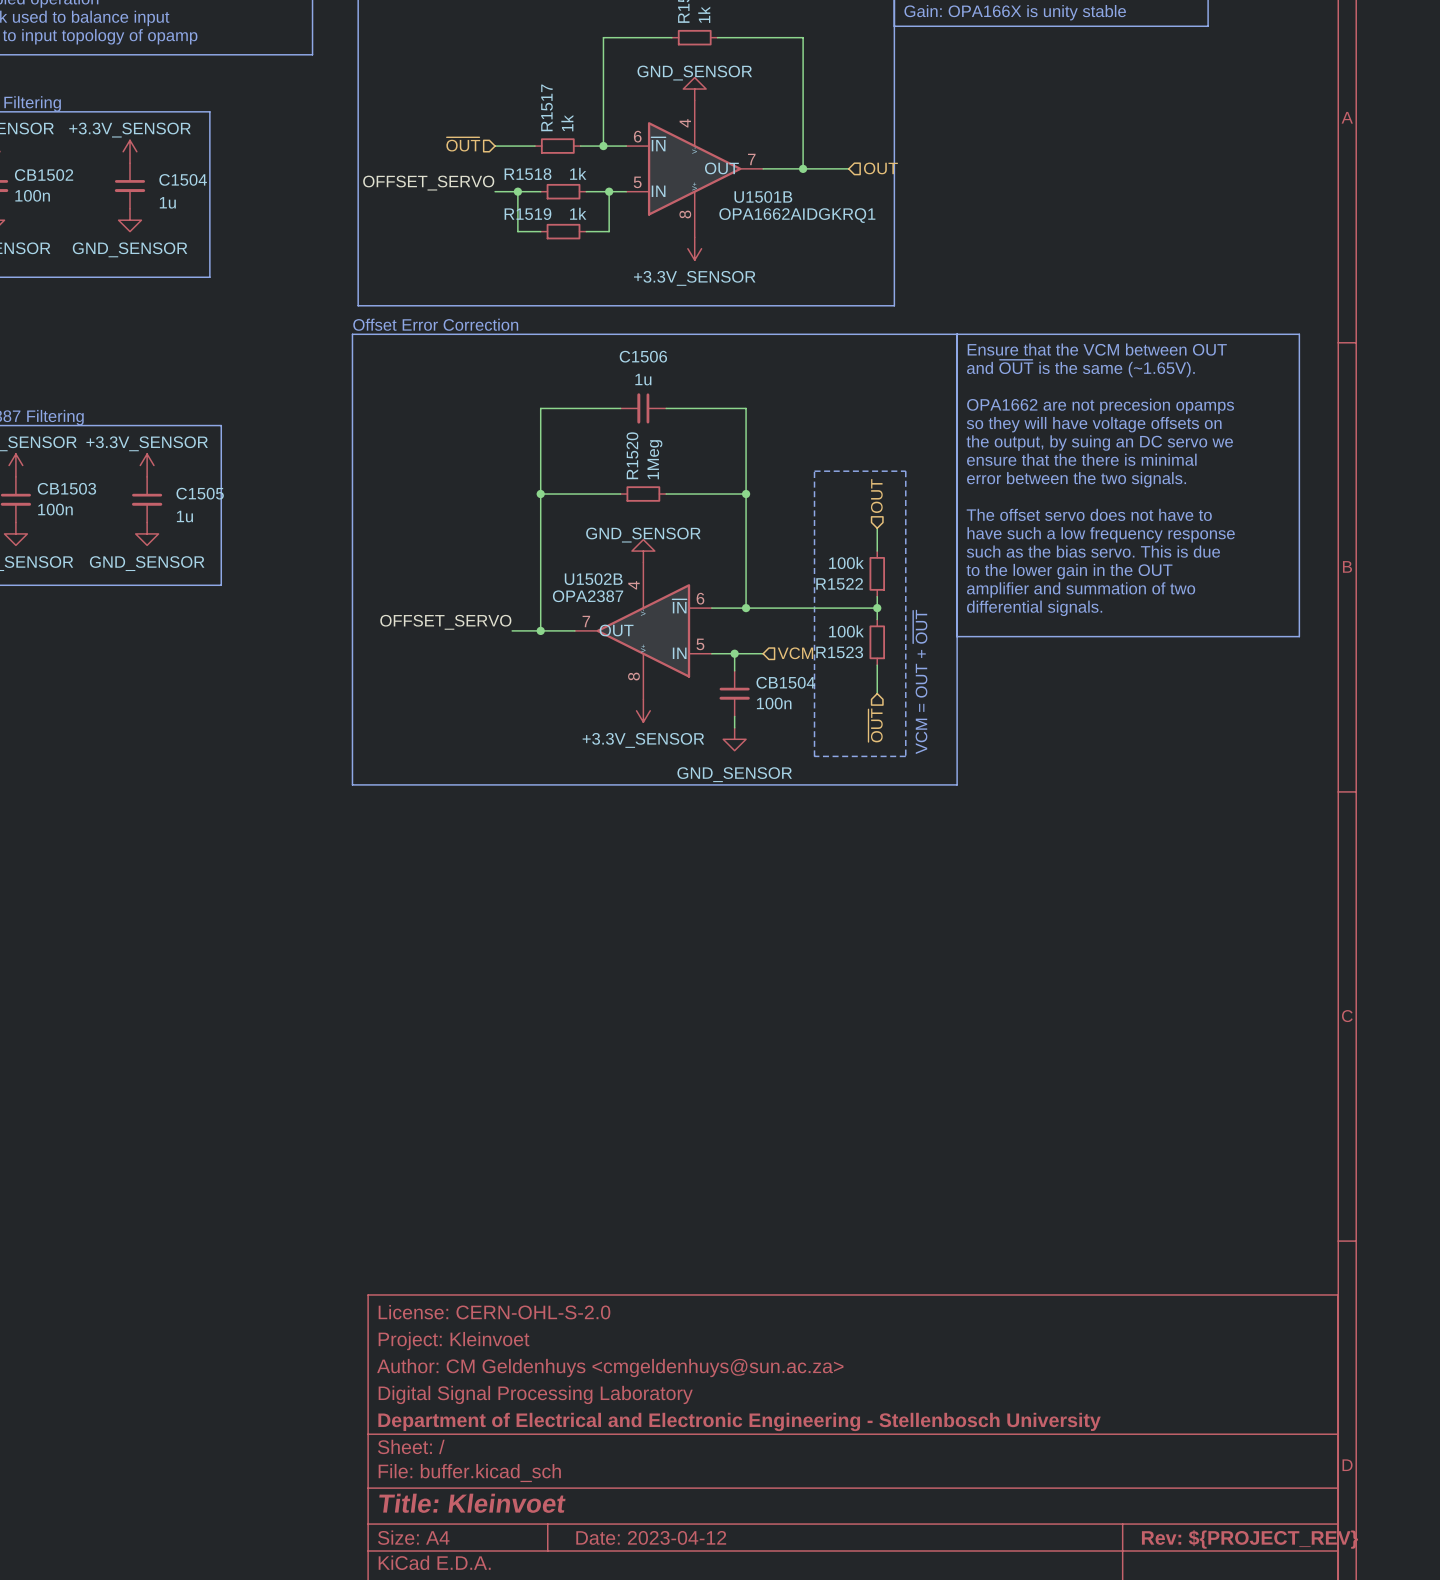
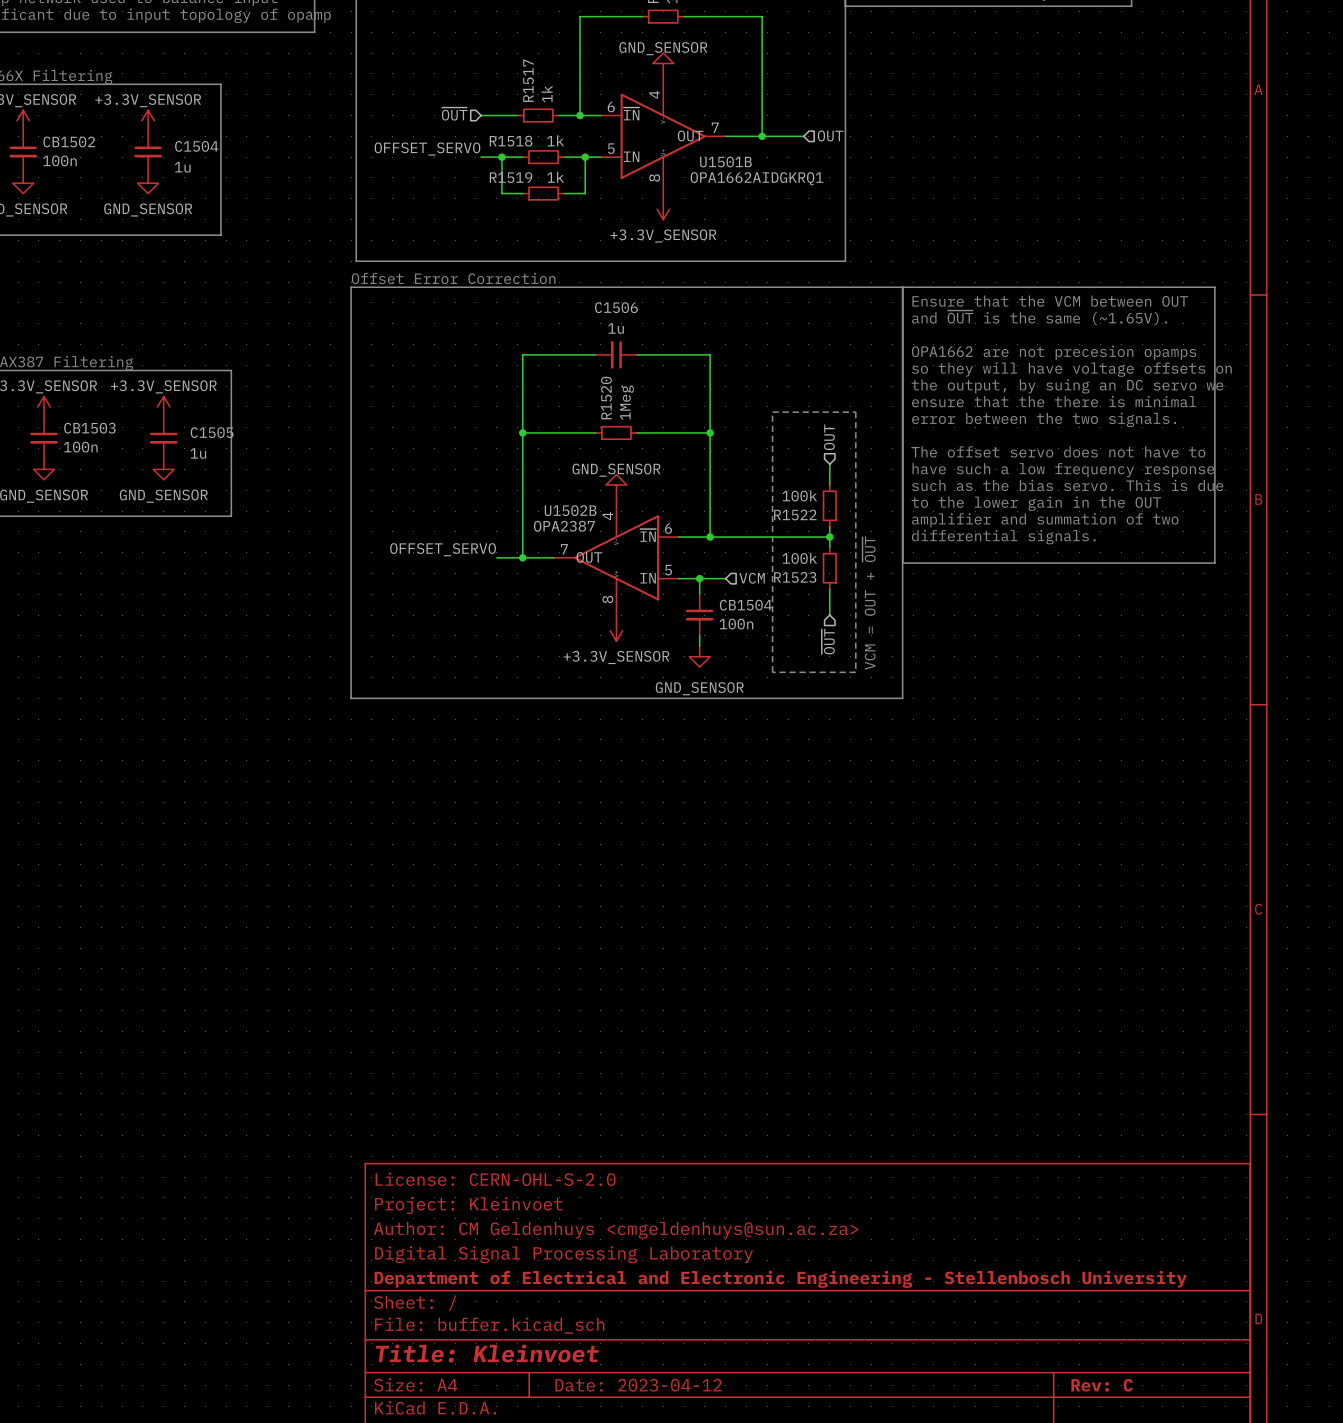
title block: Rev: ${PROJECT_REV} (1249, 1539) -> Rev: C (1102, 1385)

